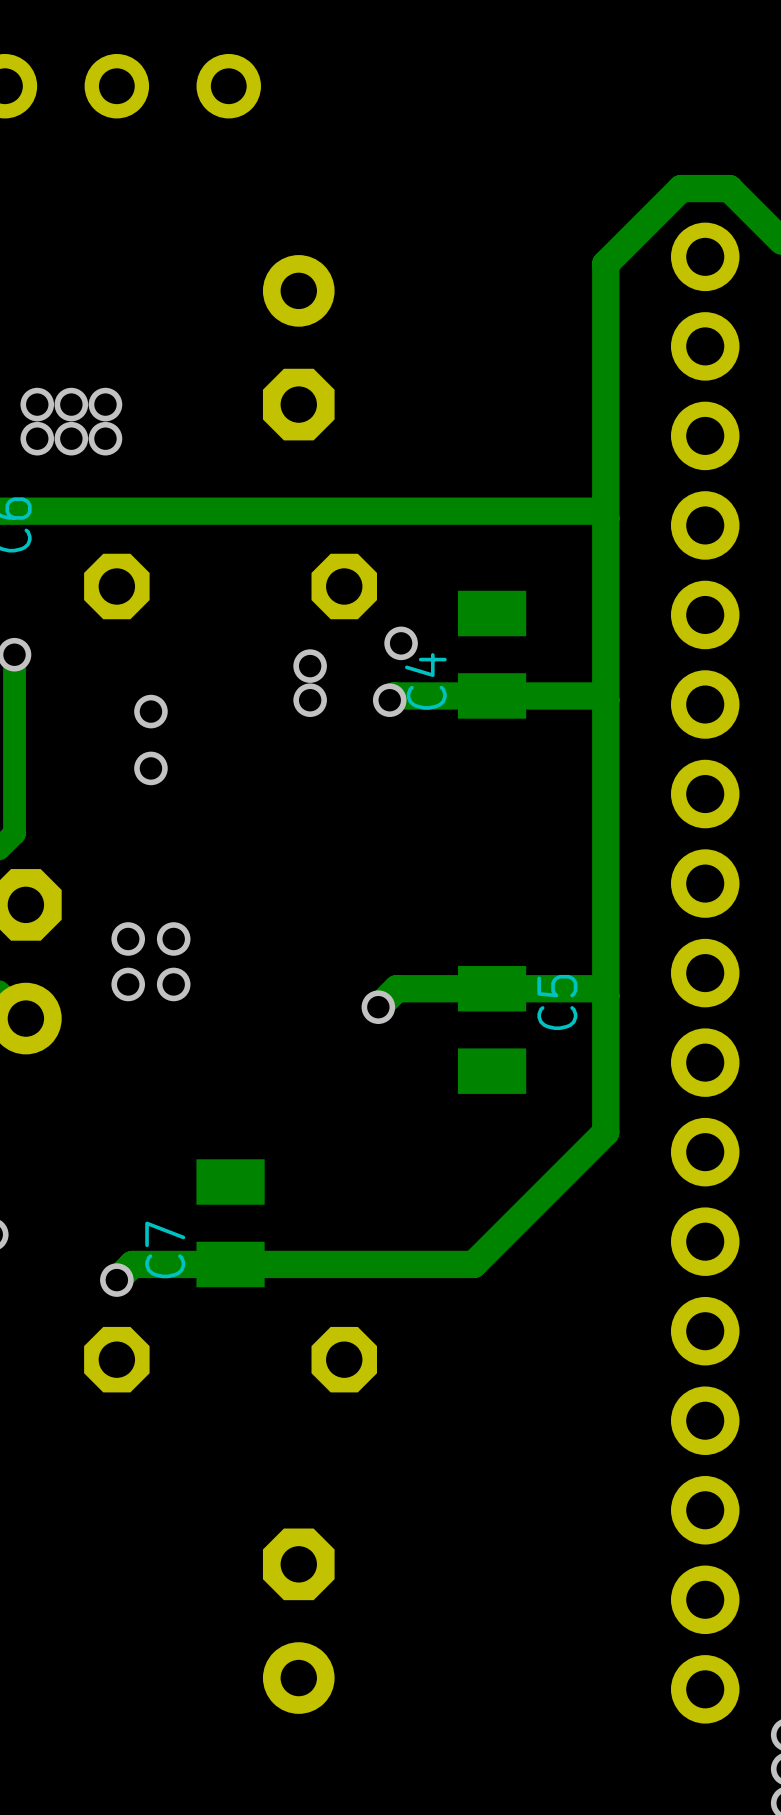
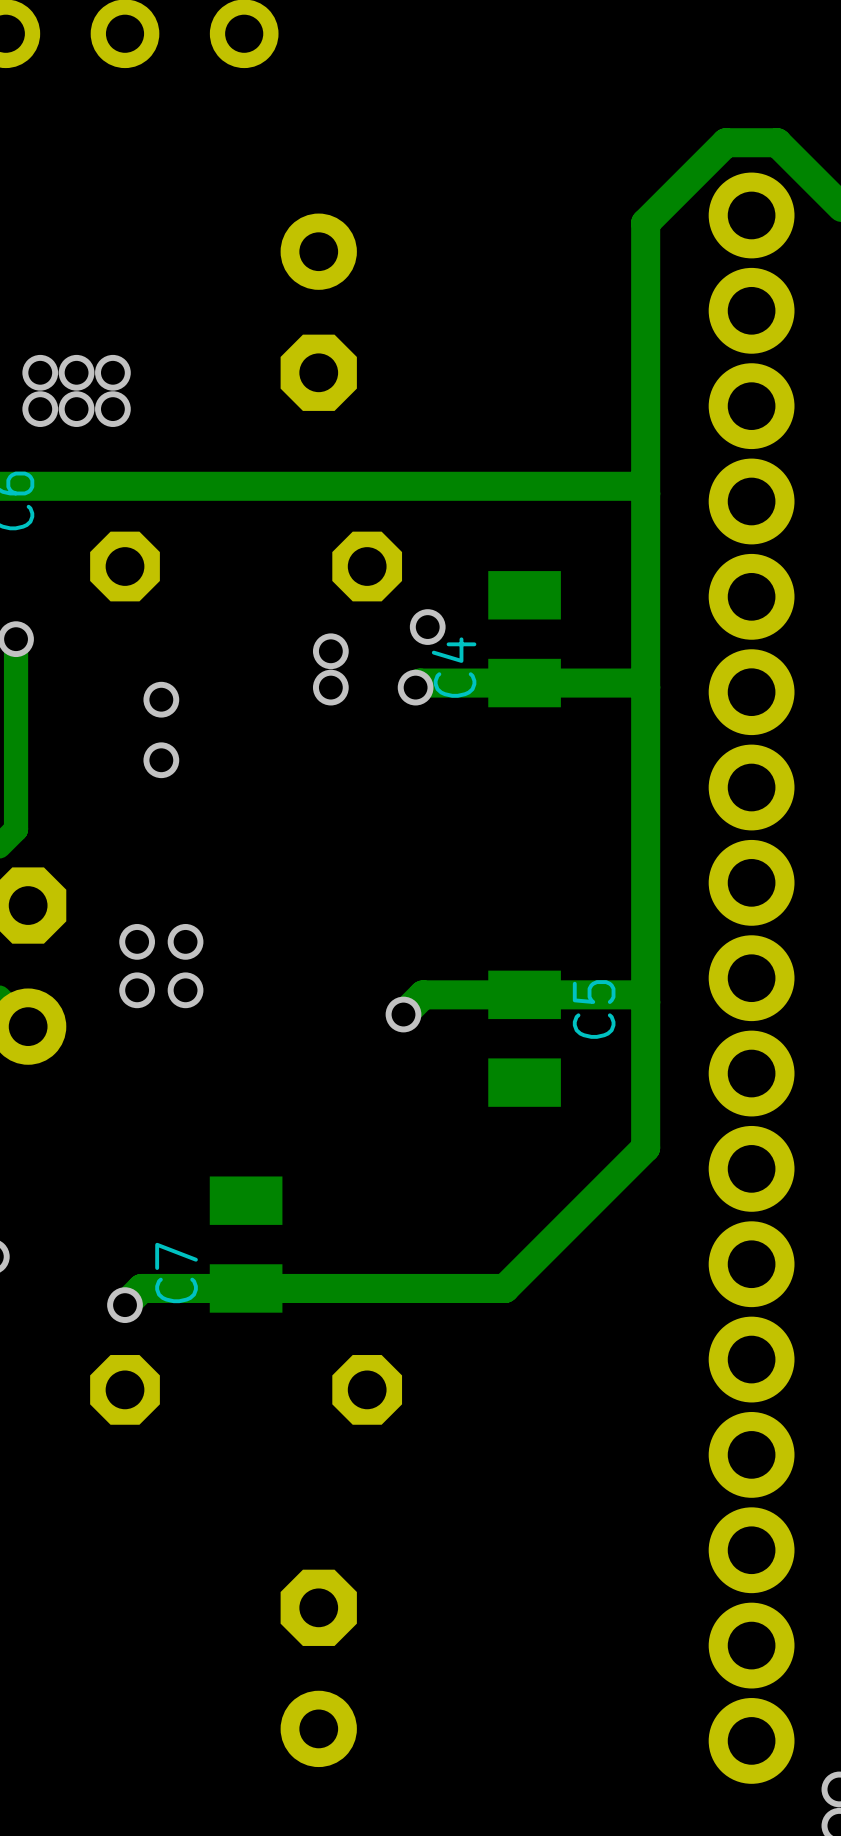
part footprint: [670, 222, 740, 1724] -> [708, 172, 795, 1784]

